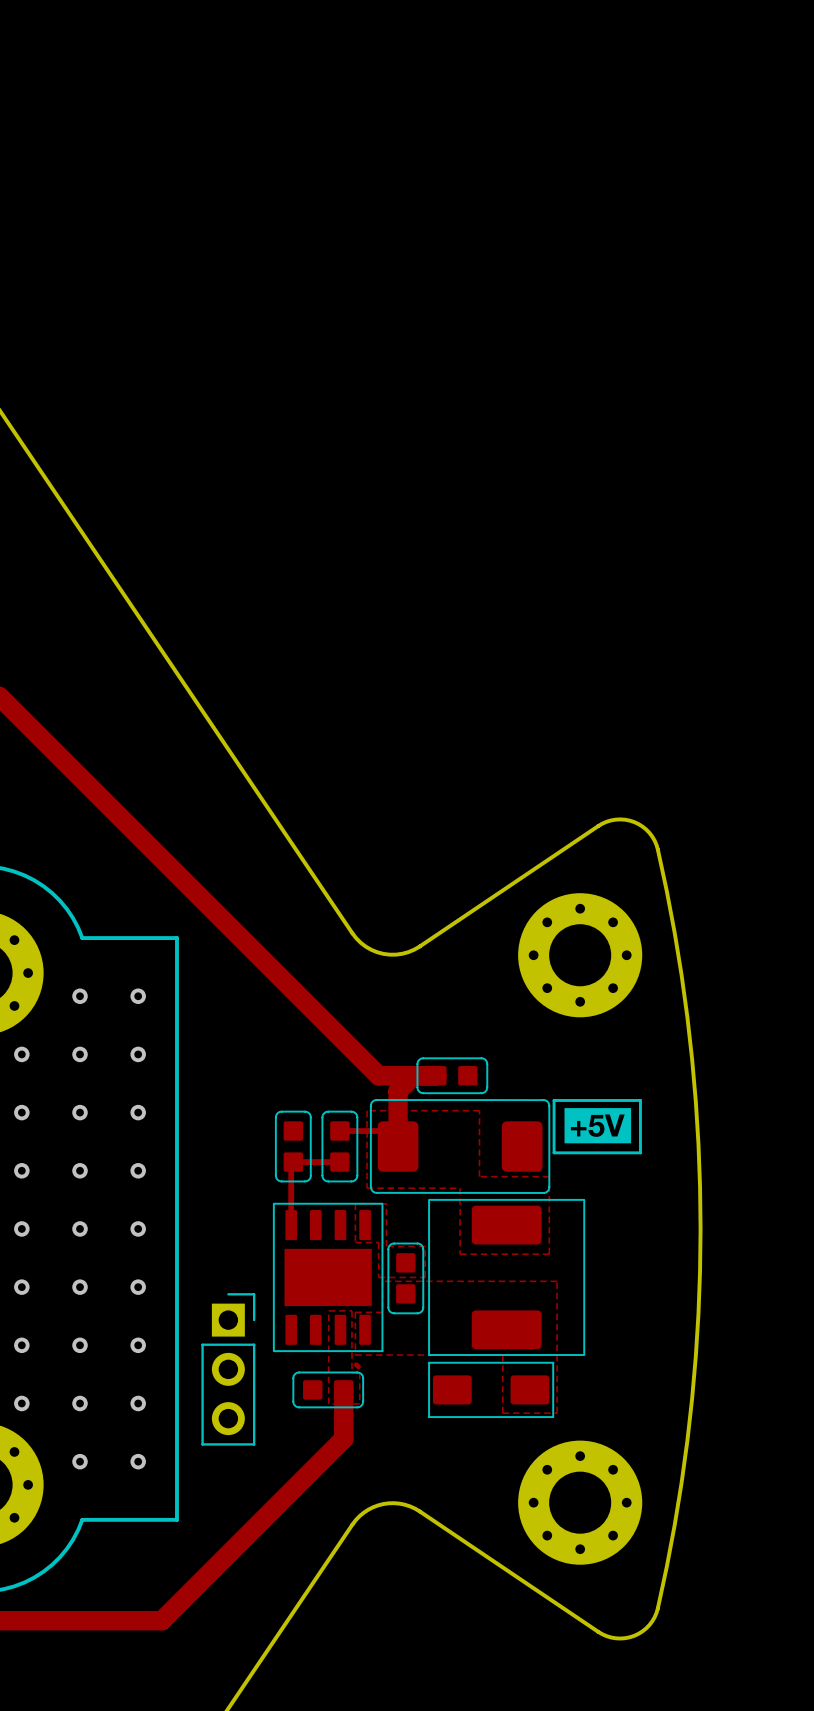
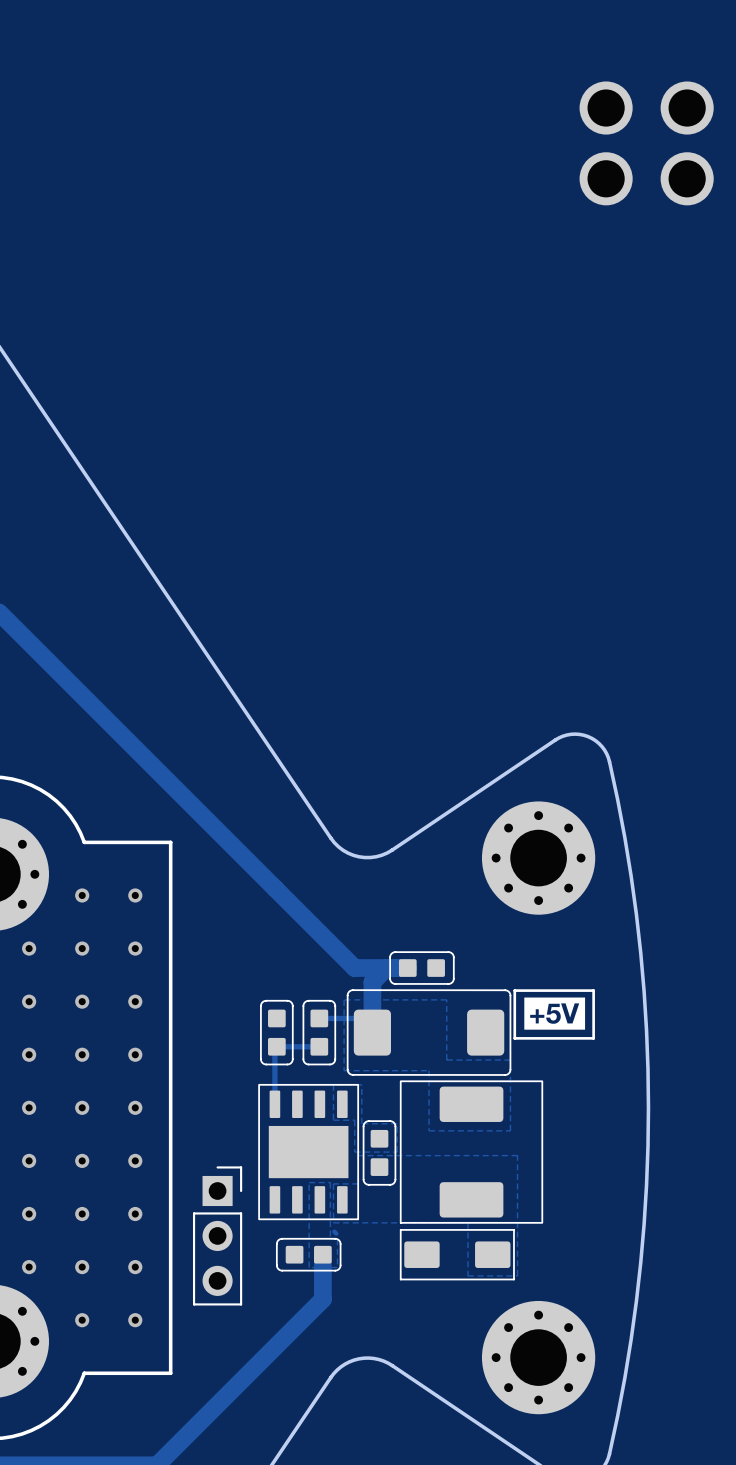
part: none -> (646, 108)
part: none -> (646, 178)

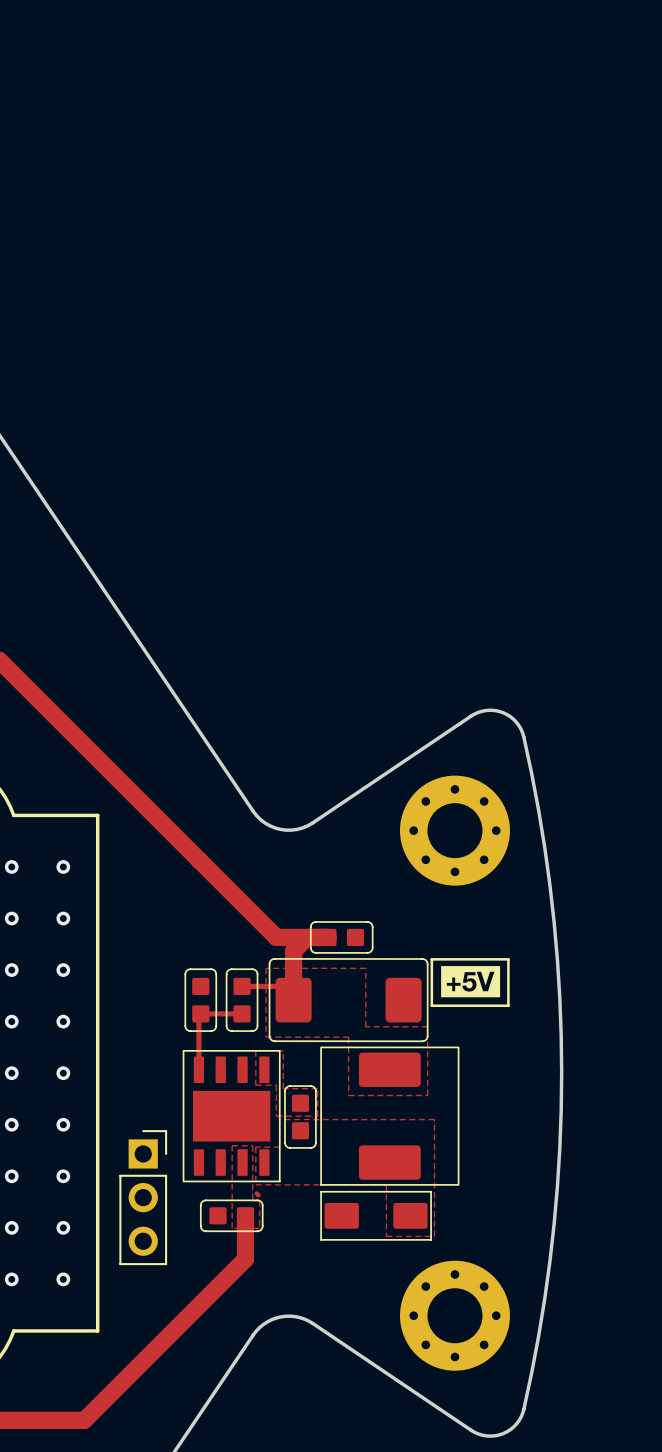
part: (646, 108) -> none
part: (646, 178) -> none

